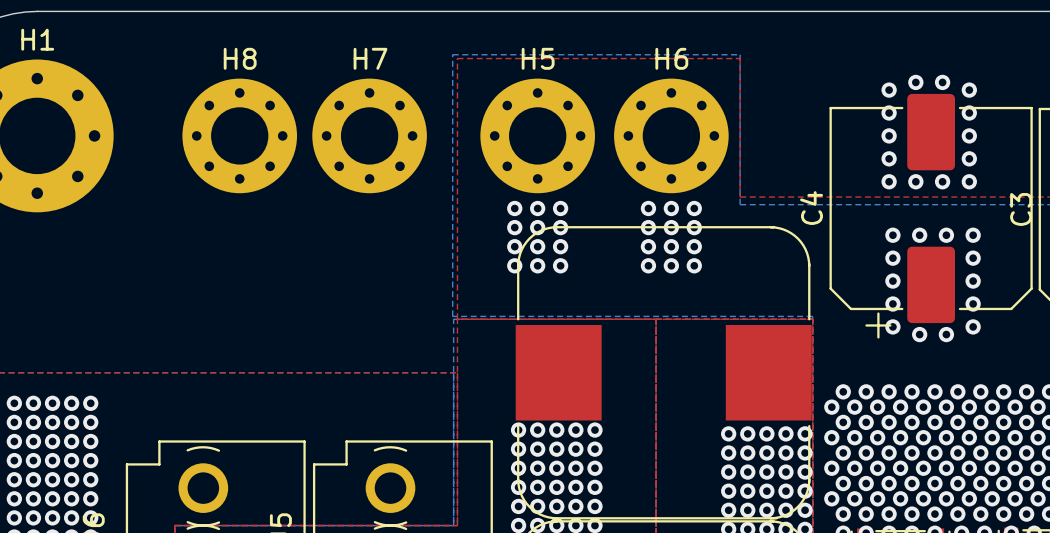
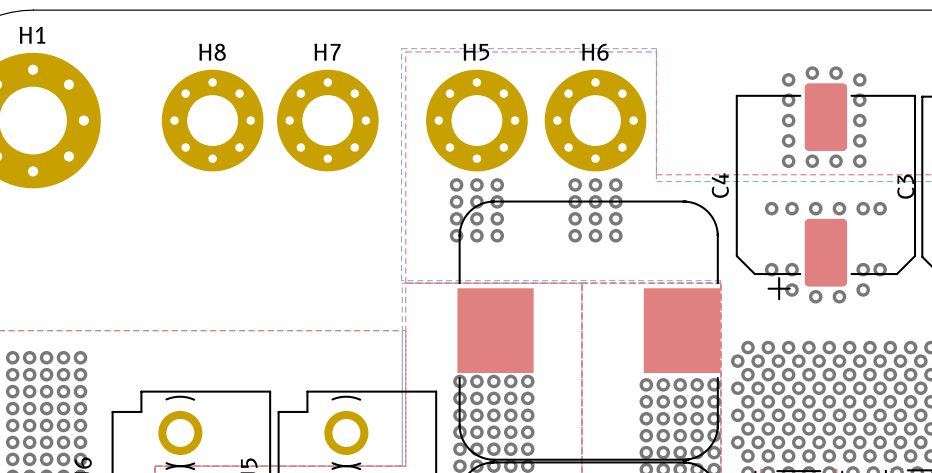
via: none -> (771, 208)
via: none -> (880, 208)
via: (892, 258) -> none
via: (973, 258) -> none
via: (892, 281) -> none
via: (973, 281) -> none
via: none -> (771, 269)
via: none -> (880, 269)

